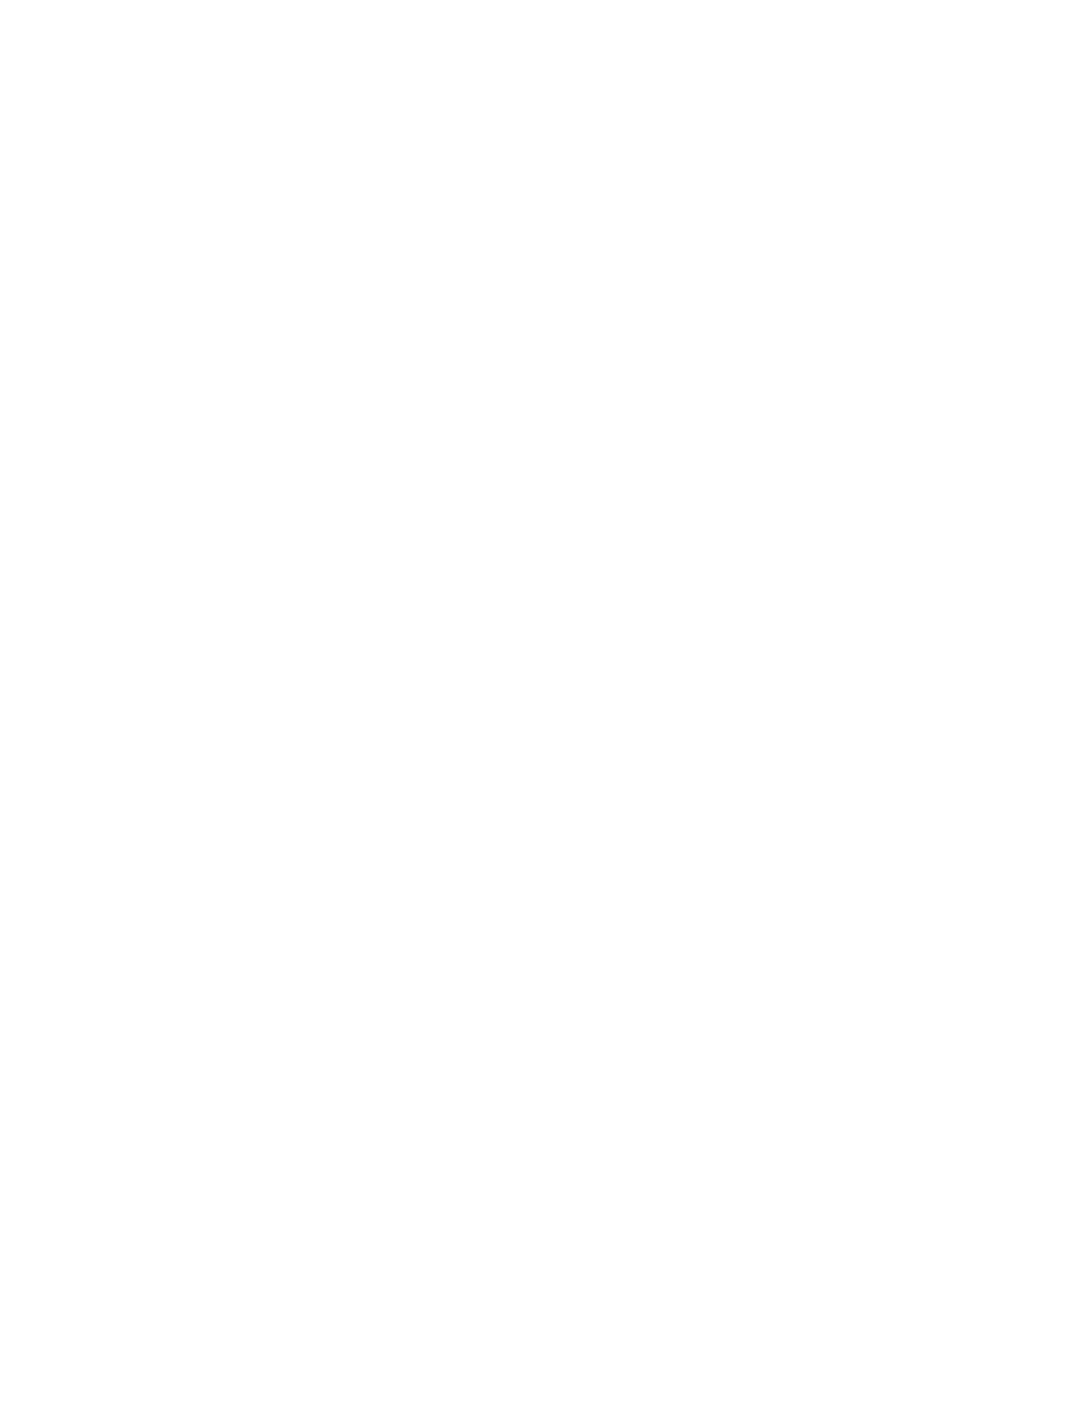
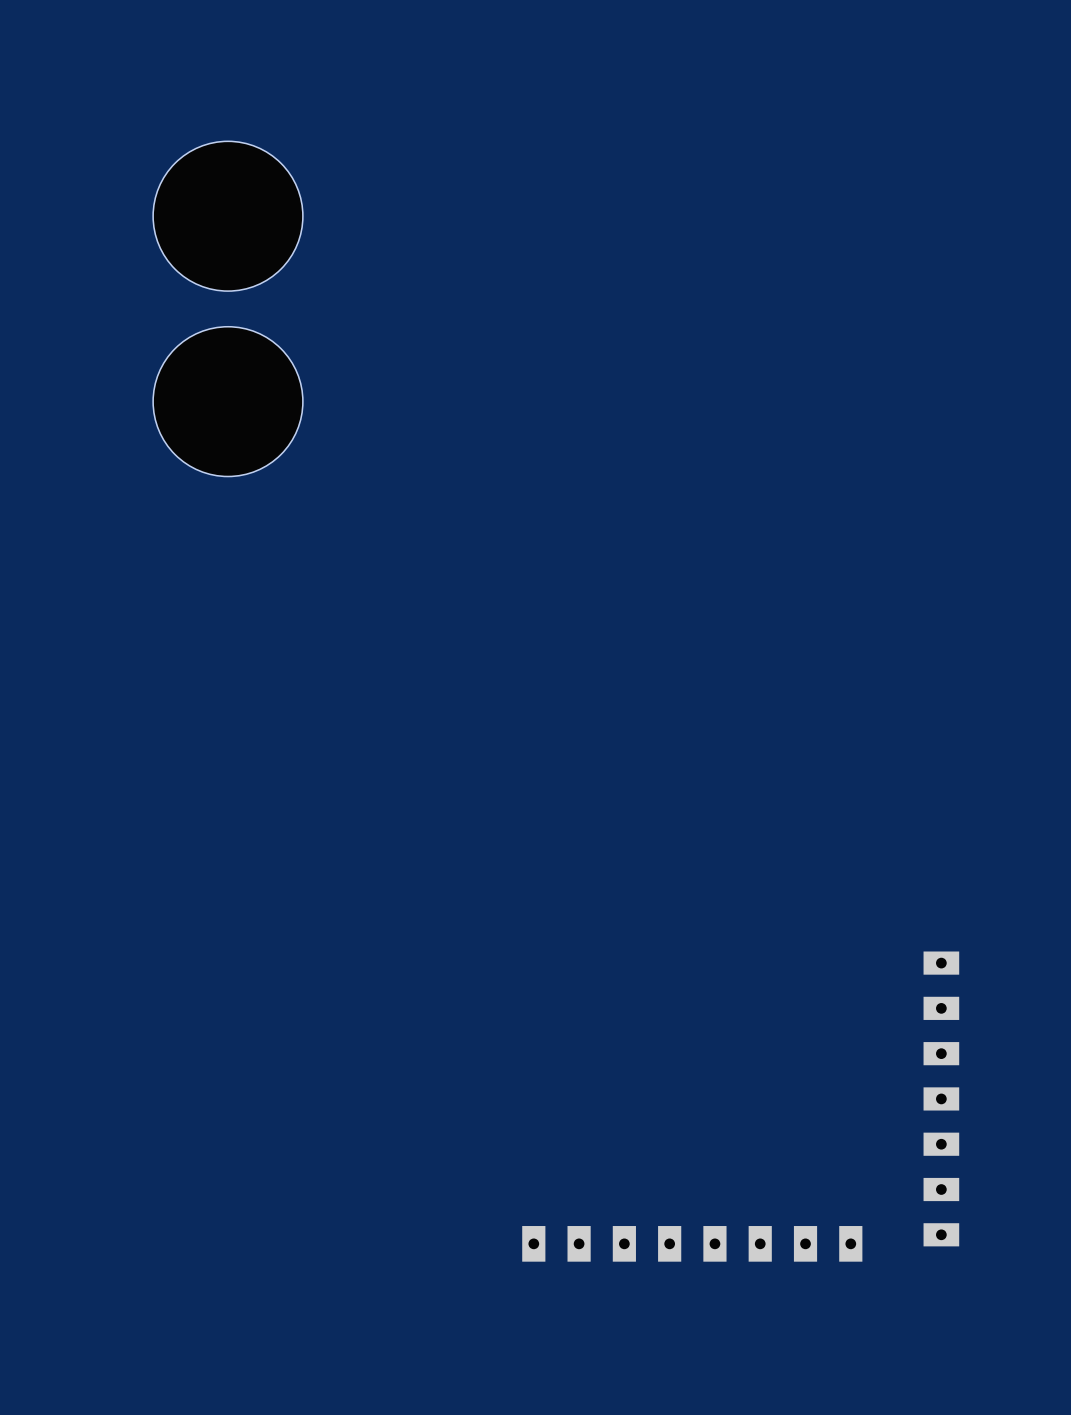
part: none -> (228, 216)
part: none -> (228, 401)
part: none -> (740, 1106)

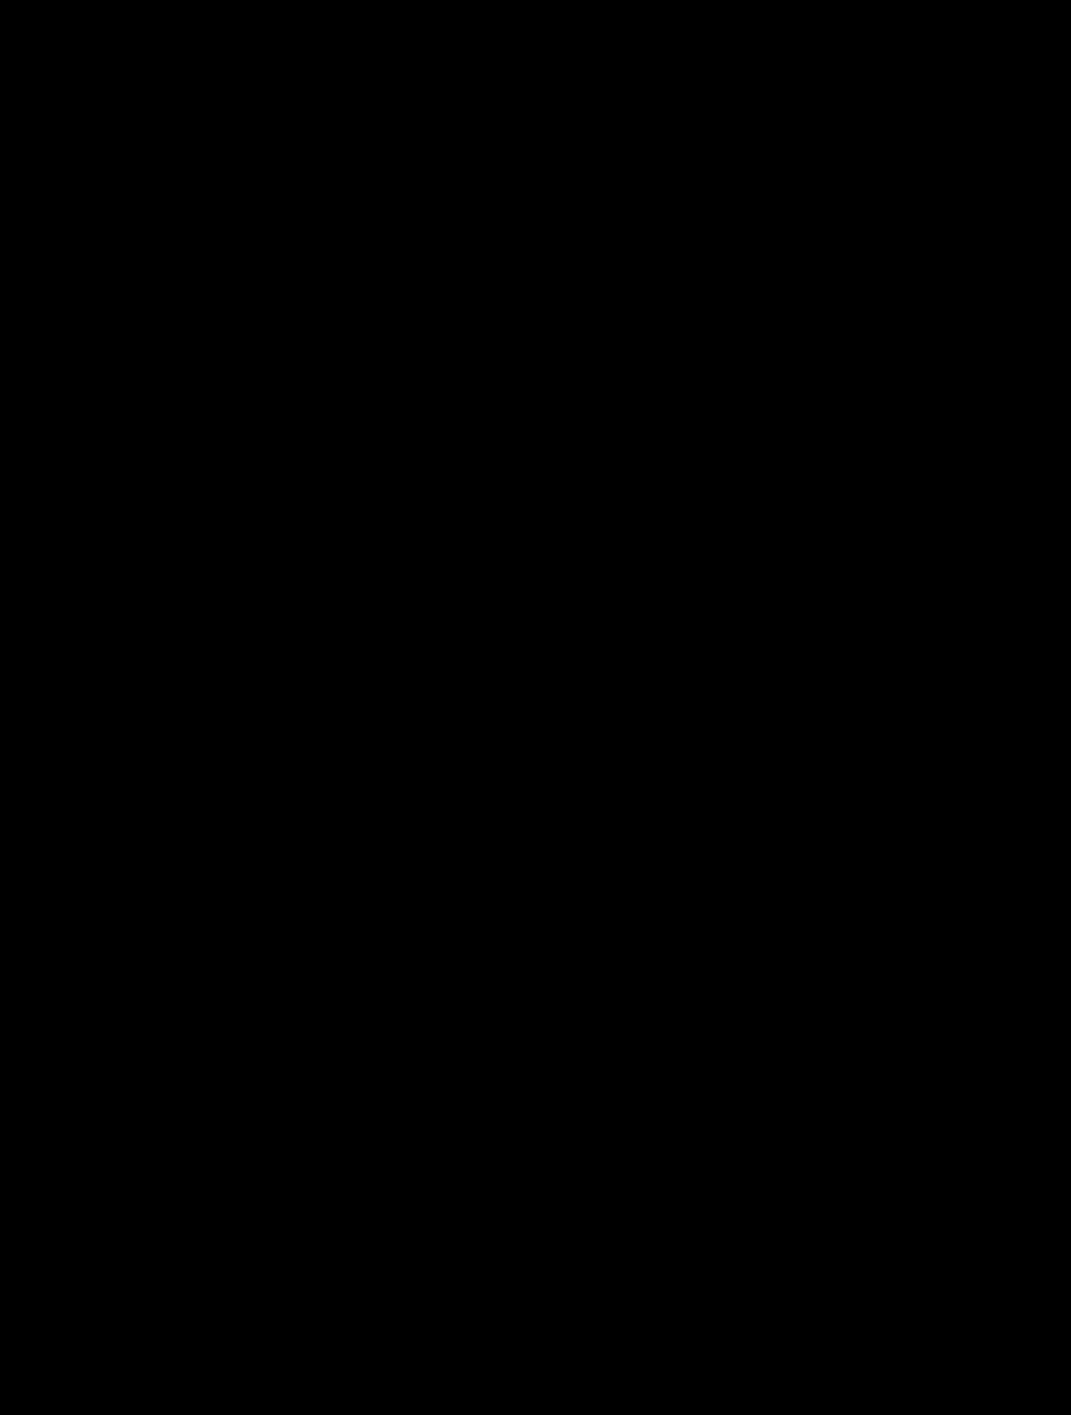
part: (228, 216) -> none
part: (228, 401) -> none
part: (740, 1106) -> none

